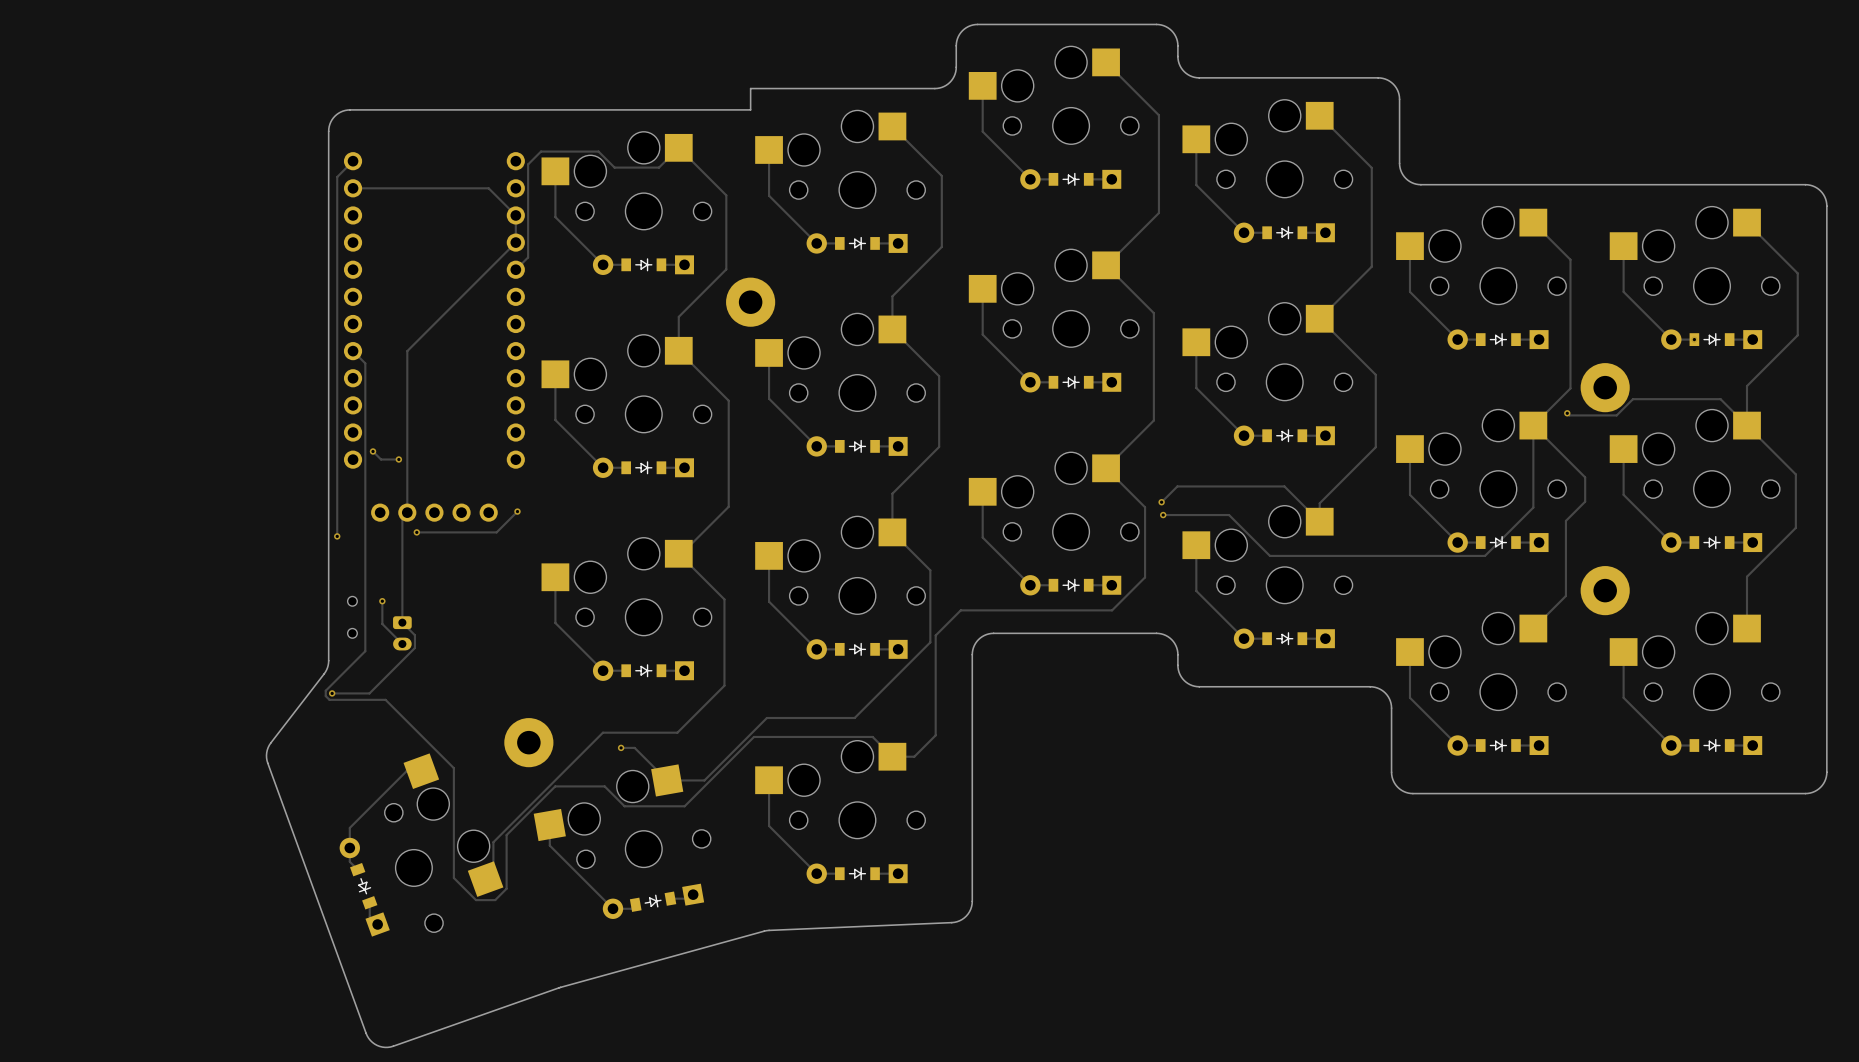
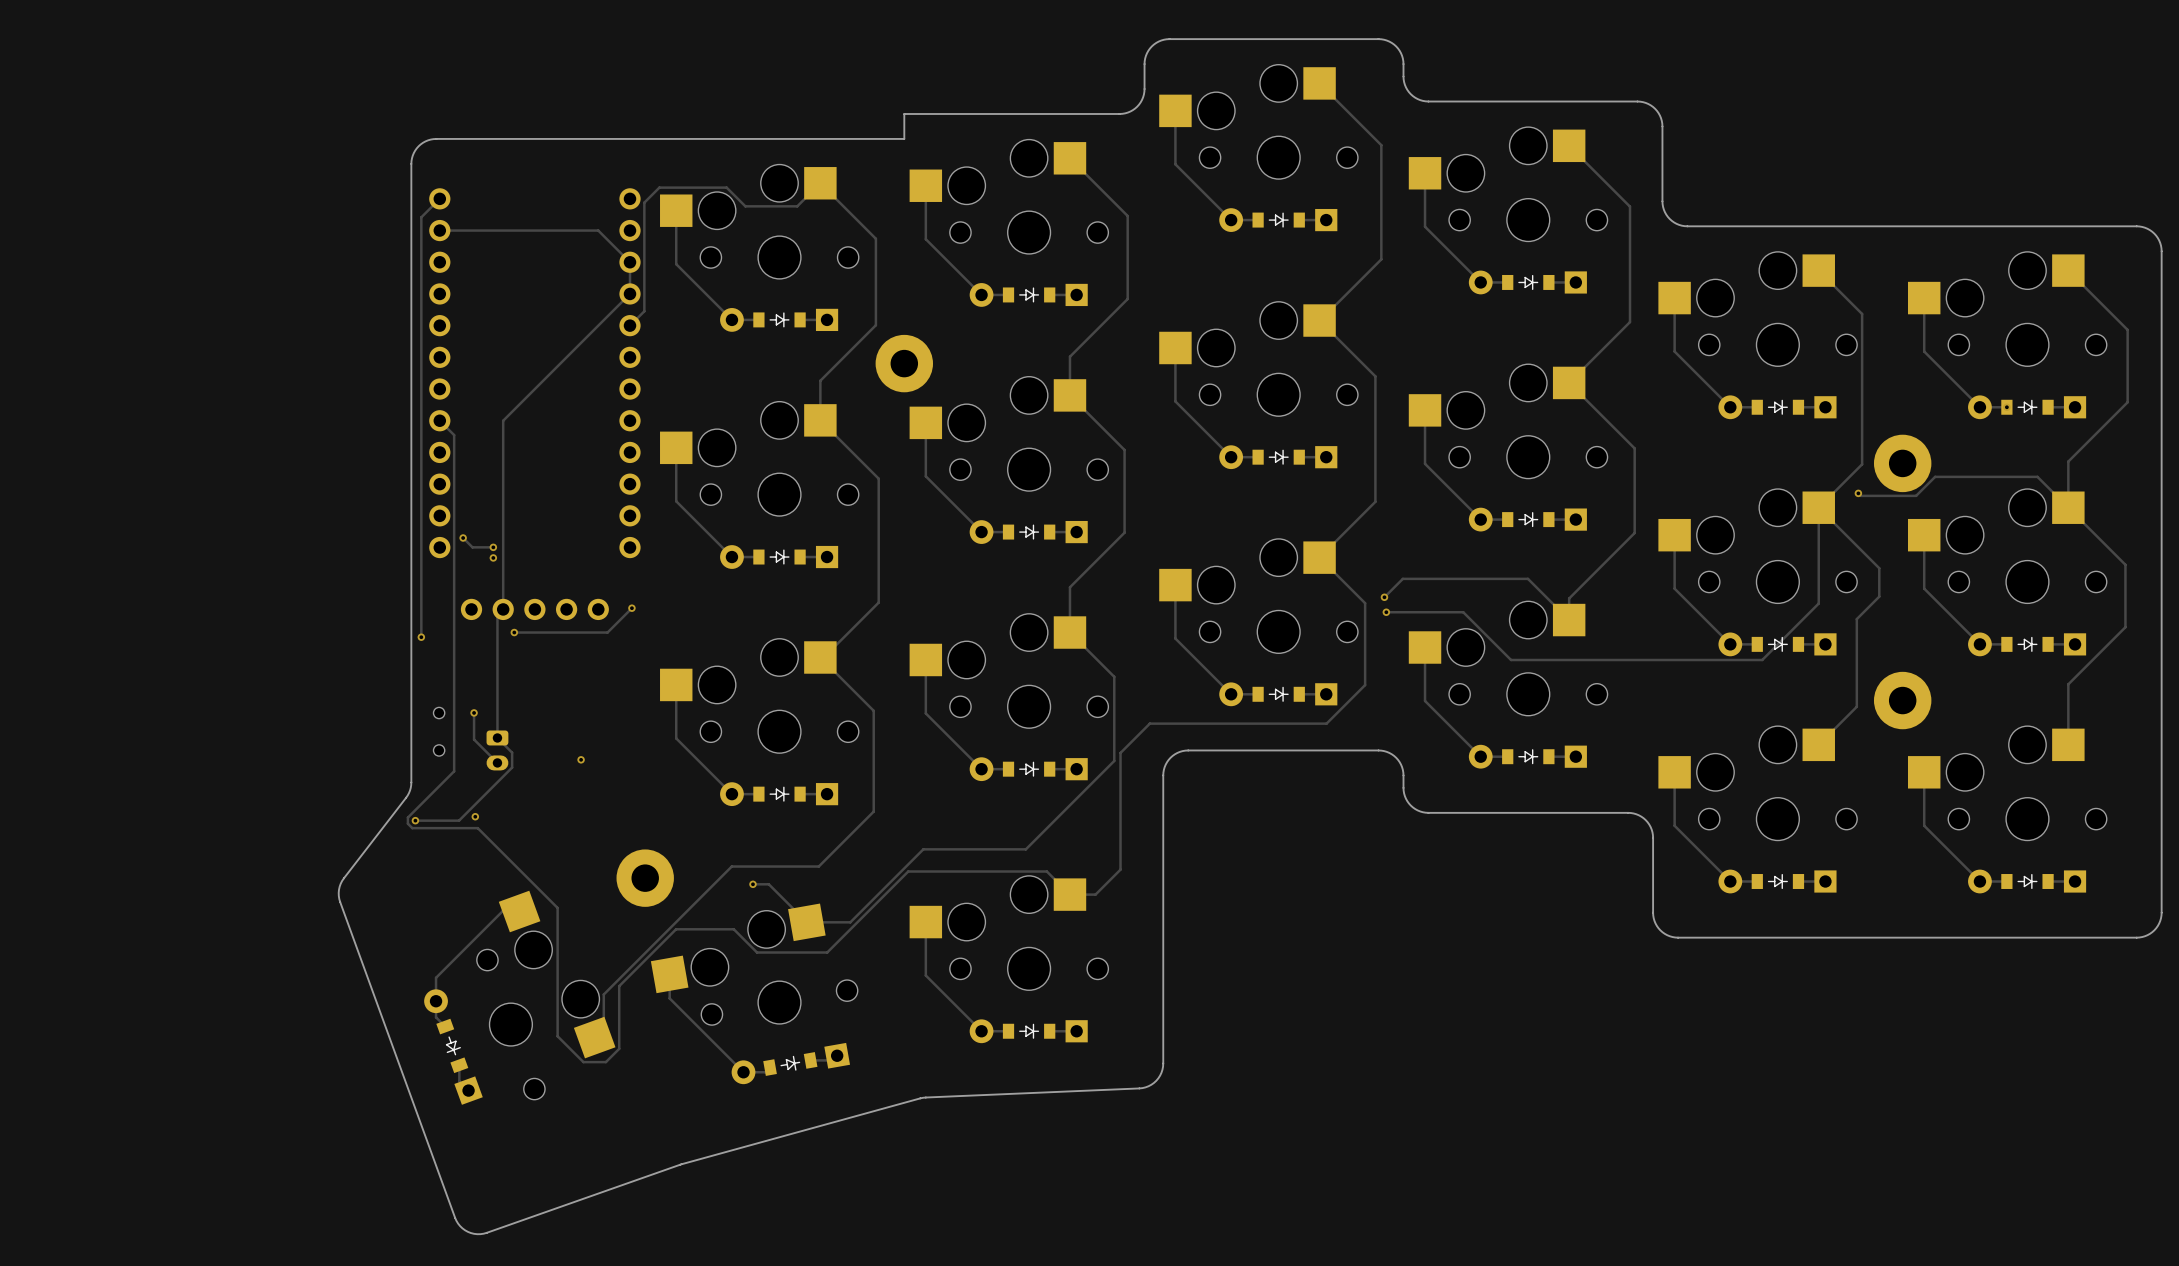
via: none -> (493, 557)
via: none -> (581, 759)
via: none -> (475, 816)

